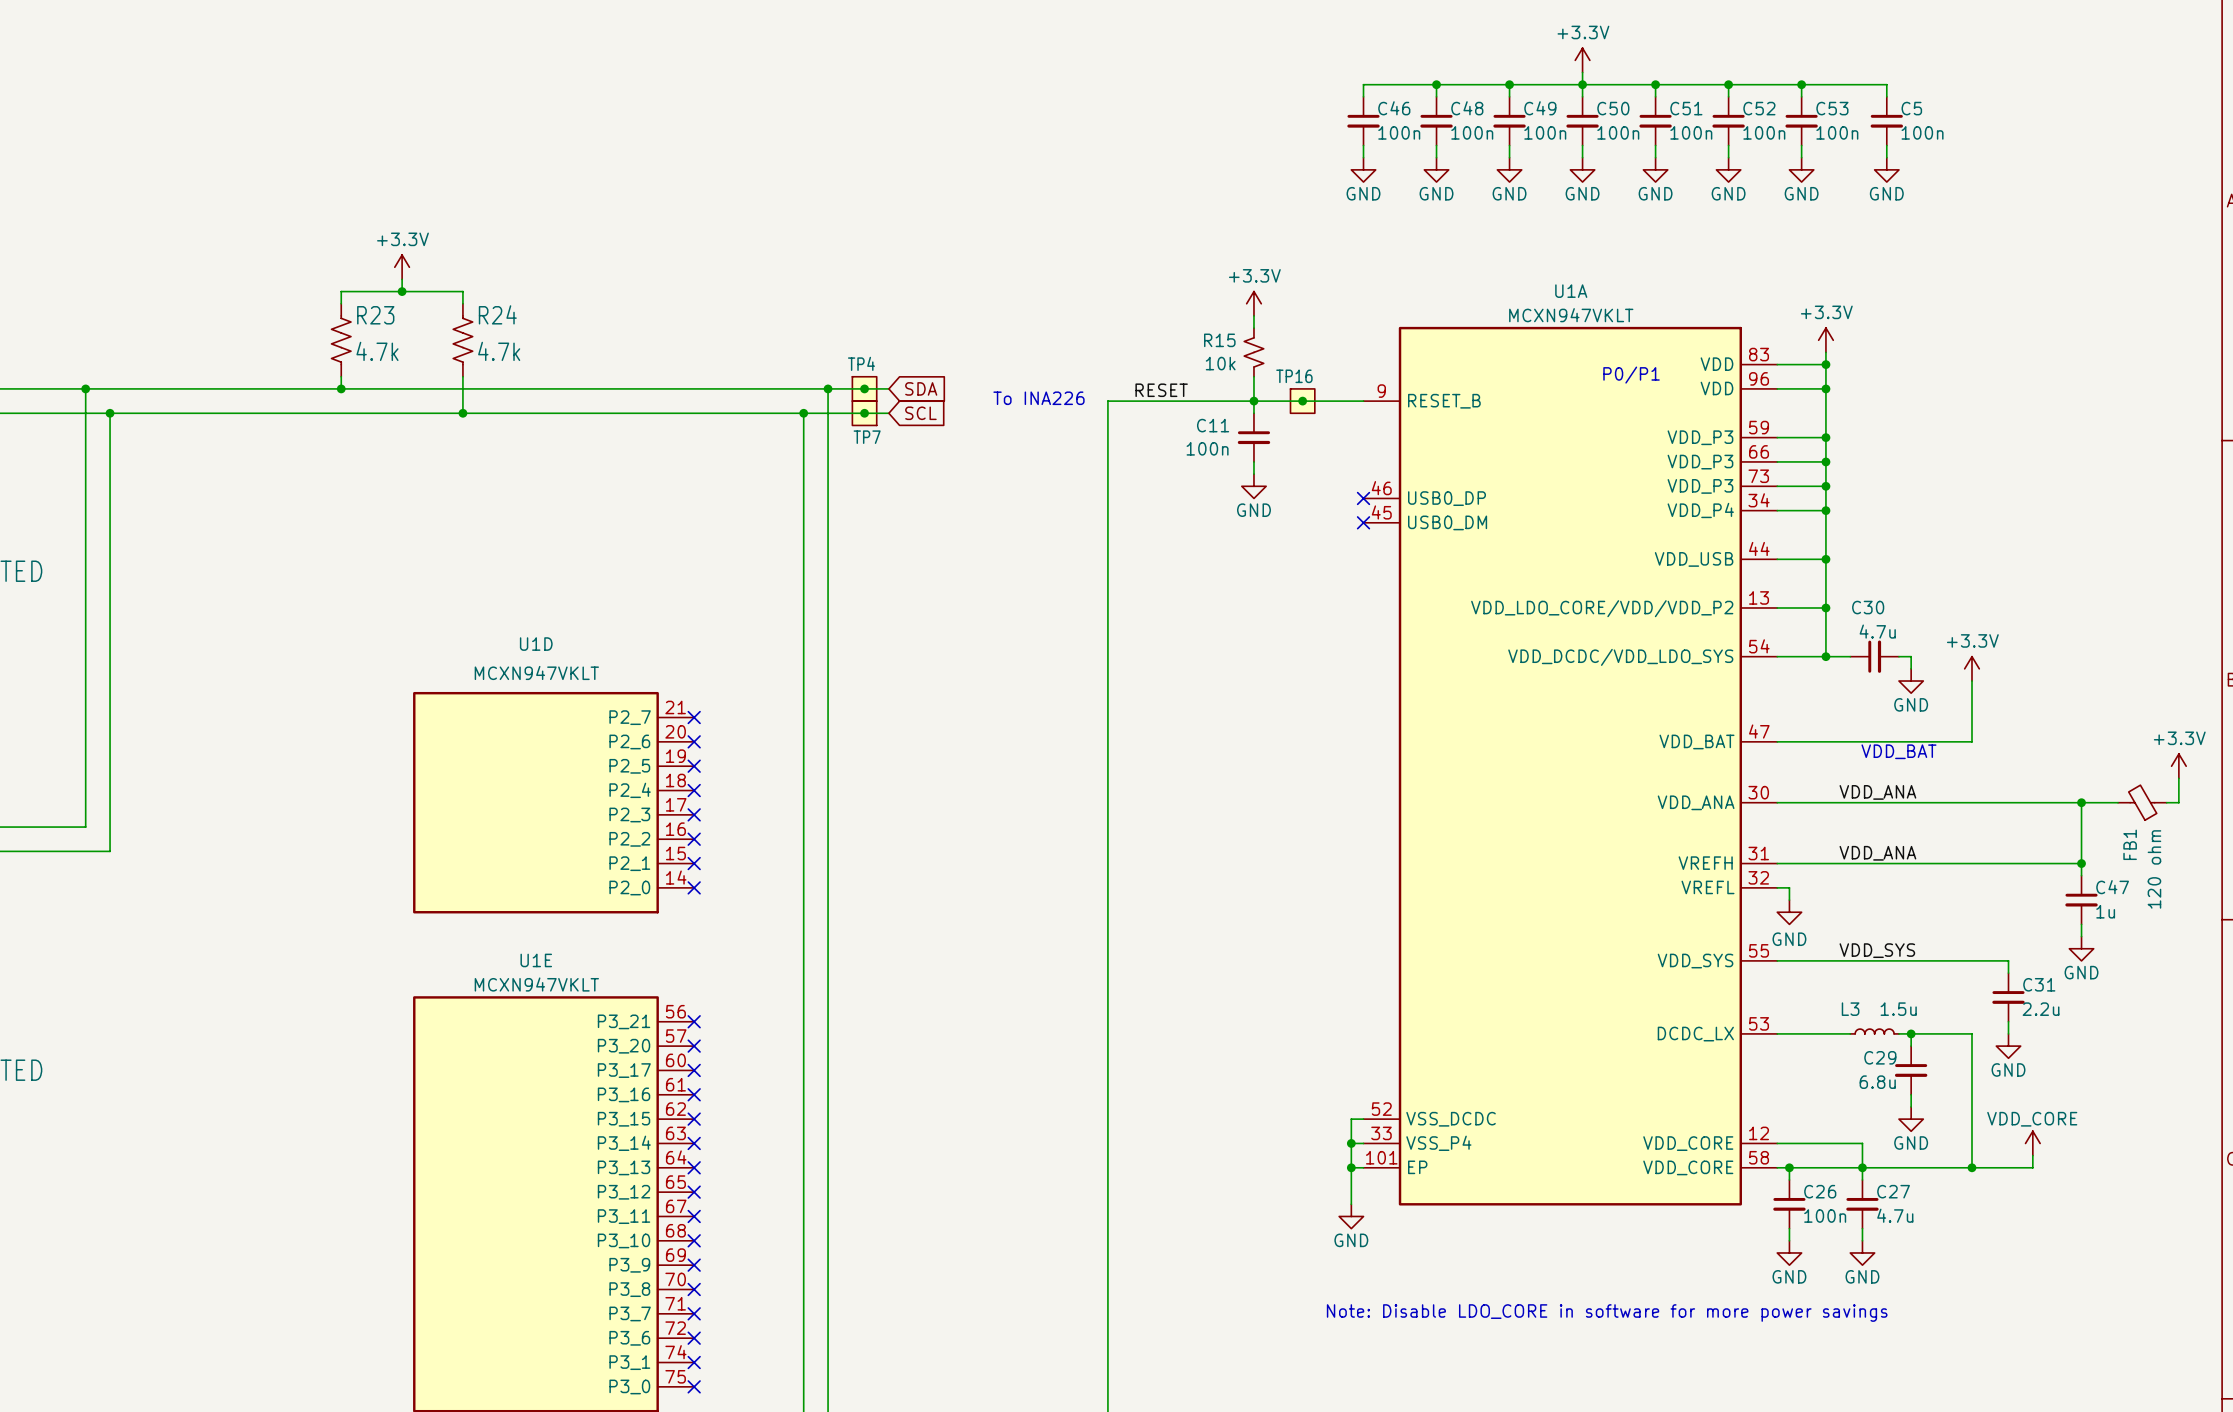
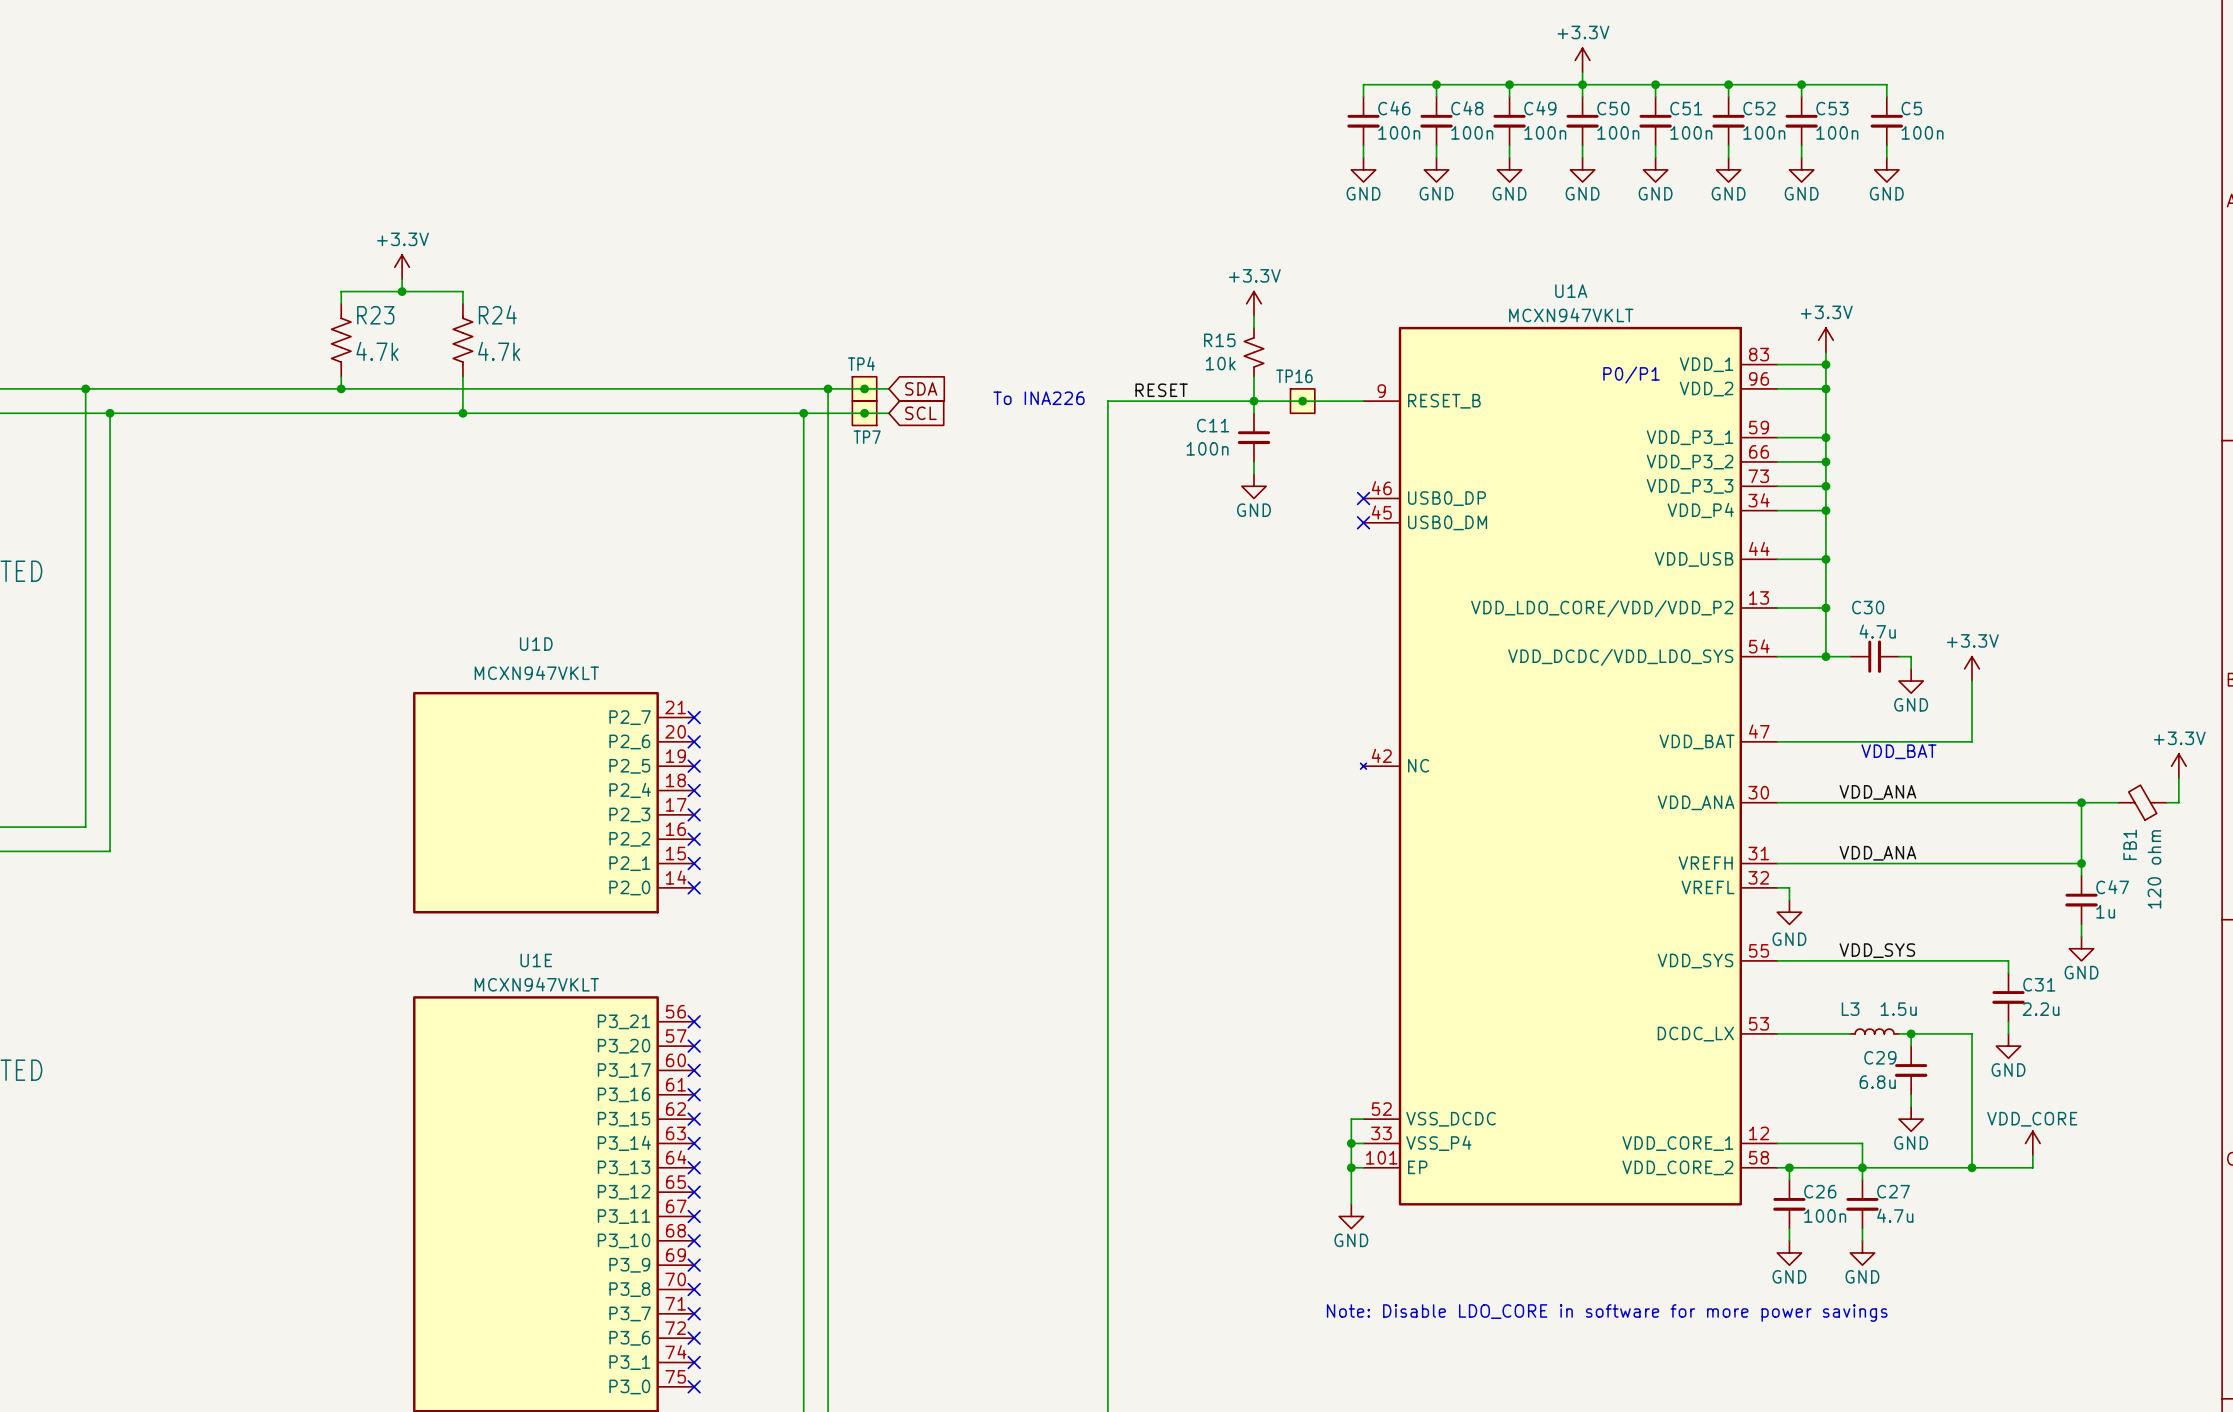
U1A symbol: [1363, 326, 1778, 1206] -> [1360, 326, 1778, 1206]

